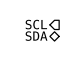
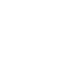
hierarchical label: SCL (36, 24) -> none
hierarchical label: SDA (36, 36) -> none

